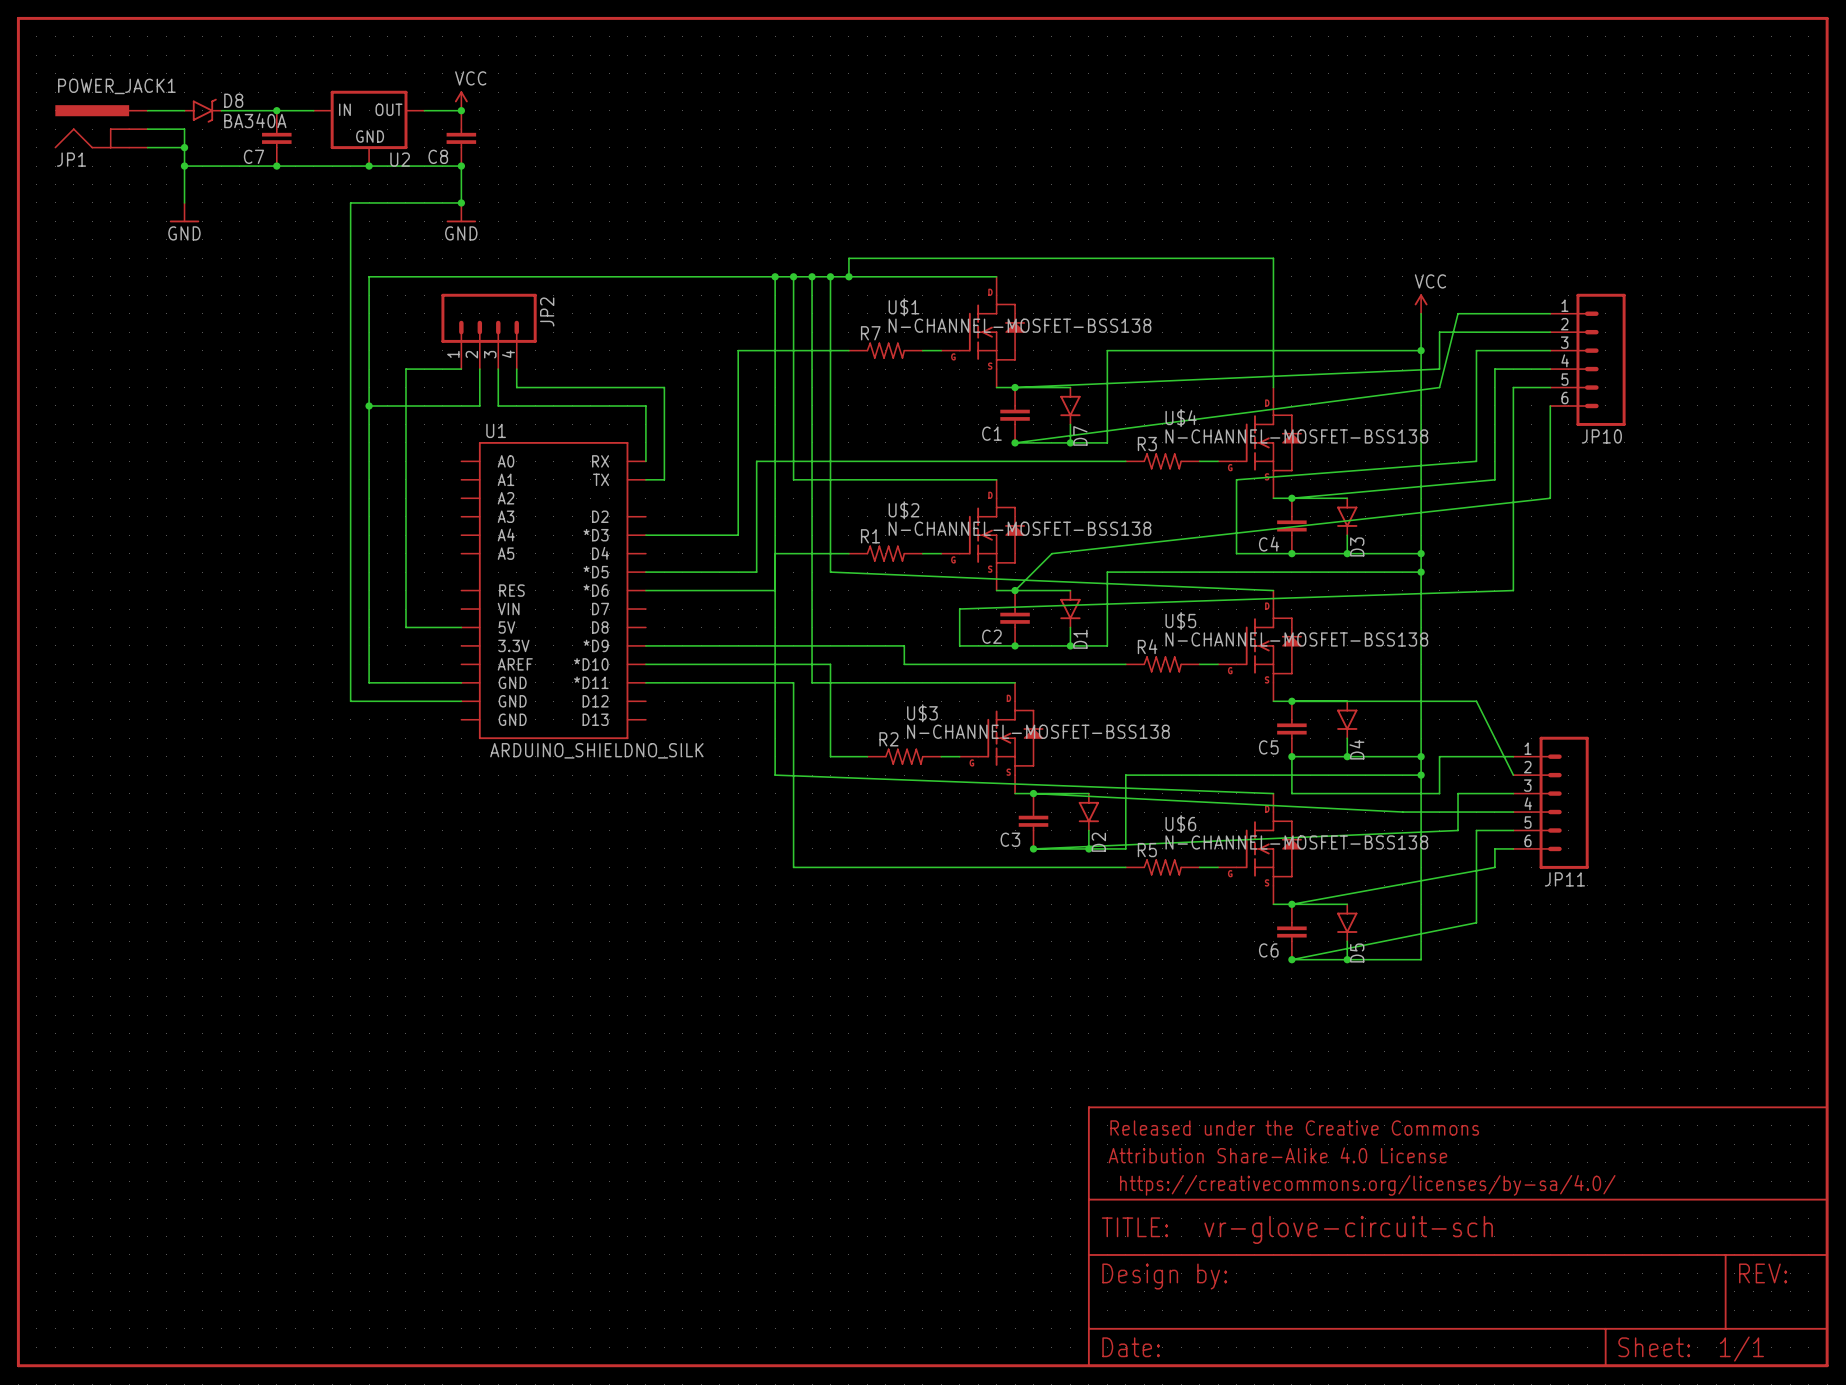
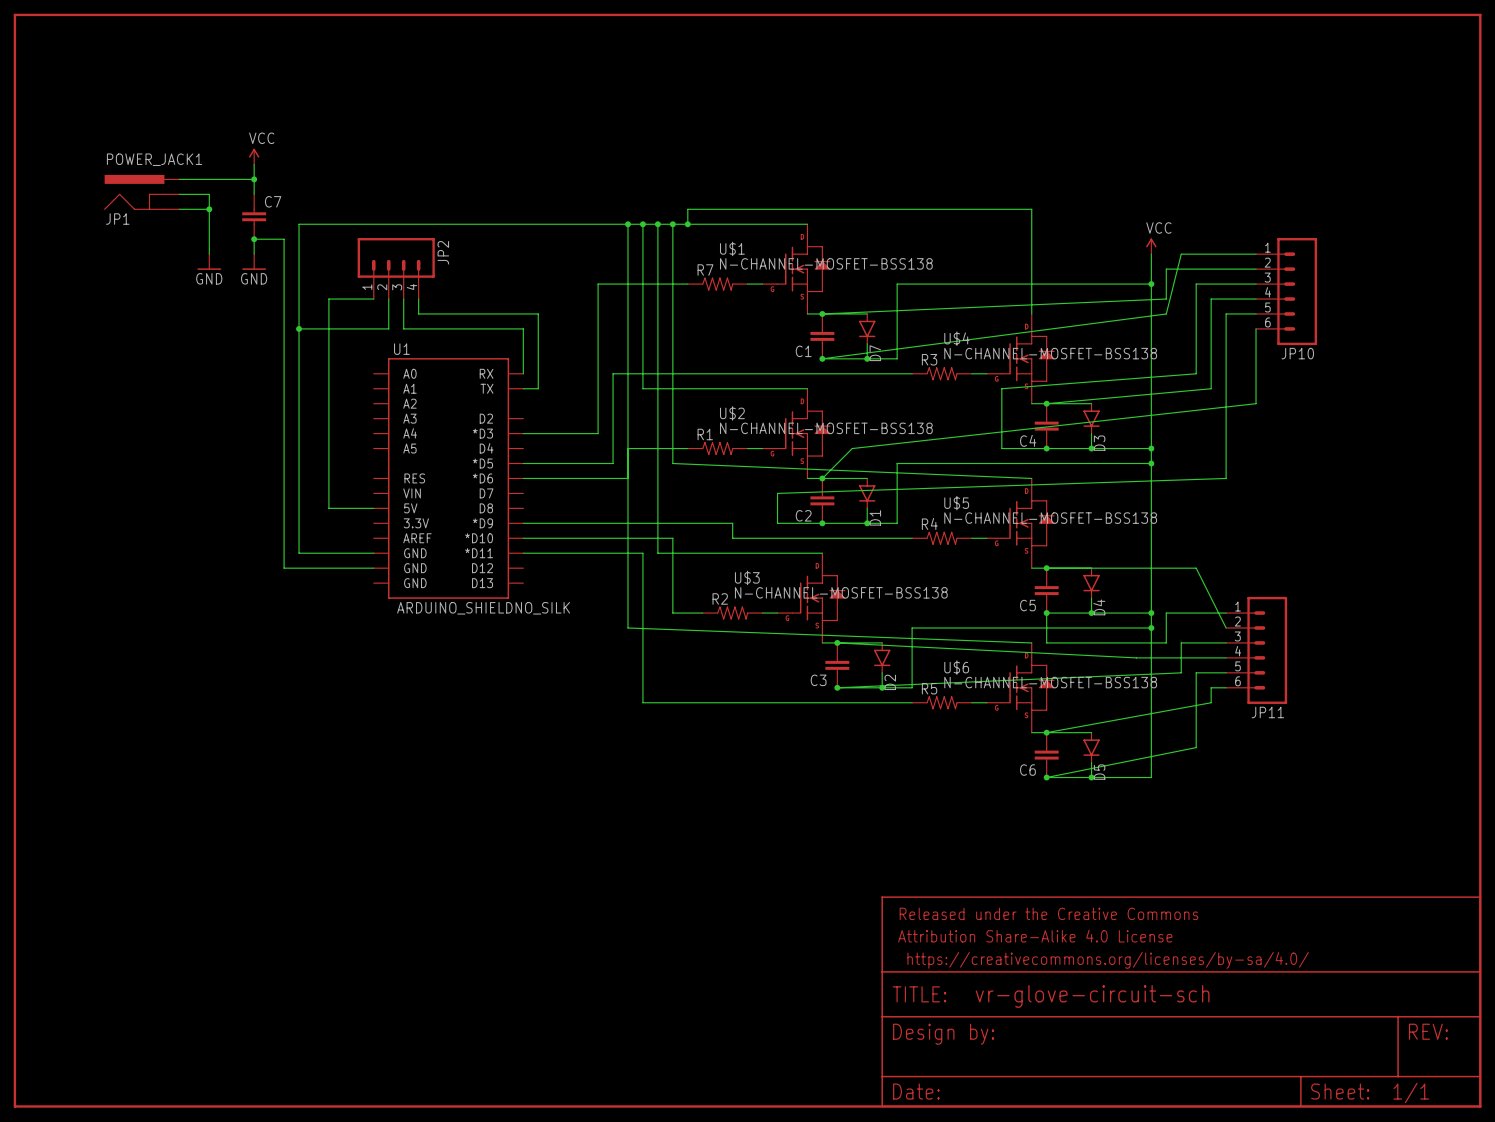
power symbol position: VCC (461, 101) -> VCC (254, 156)
wire: (147, 110) (184, 110) -> none
D8: BA340A (202, 110) -> none
wire: (221, 110) (313, 110) -> (179, 179) (254, 179)
junction: (276, 110) -> none
wire: (424, 110) (461, 110) -> none
junction: (461, 110) -> none
JP1 position: (101, 126) -> (141, 192)
U2: (369, 128) -> none
wire: (147, 129) (184, 129) (184, 202) -> (179, 194) (209, 194) (209, 254)
C7 position: (276, 138) -> (254, 216)
C8: (461, 138) -> none
wire: (147, 147) (184, 147) -> (179, 209) (209, 209)
junction: (184, 147) -> none
C7 name position: C7 (253, 156) -> C7 (273, 201)
wire: (184, 166) (461, 166) (461, 202) (350, 202) (350, 295) -> (254, 254) (254, 239) (284, 239)
junction: (184, 166) -> none
junction: (276, 166) -> none
junction: (369, 166) -> none
junction: (461, 166) -> none
wire: none -> (254, 164) (254, 194)
junction: (461, 202) -> none
power symbol: GND (184, 212) -> none
power symbol: GND (461, 212) -> none
junction: none -> (254, 179)
junction: none -> (209, 209)
junction: none -> (254, 239)
power symbol: none -> GND (209, 262)
power symbol: none -> GND (254, 262)

